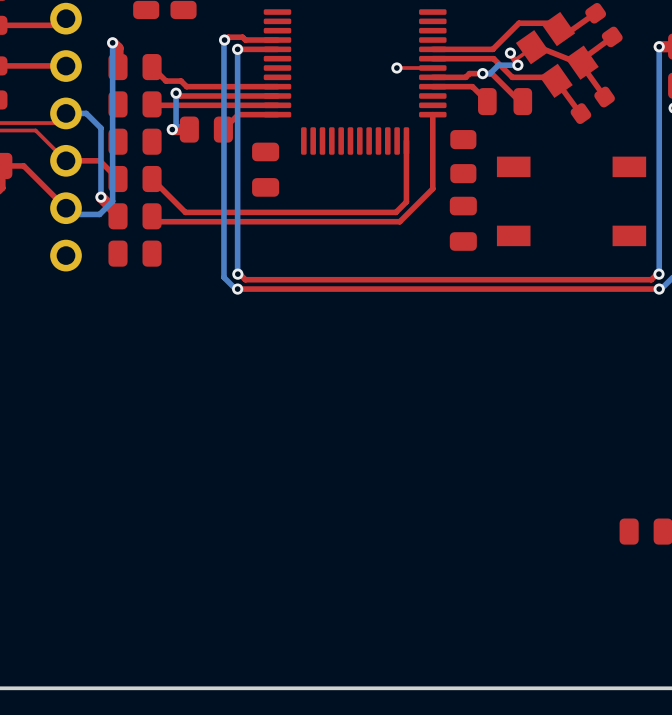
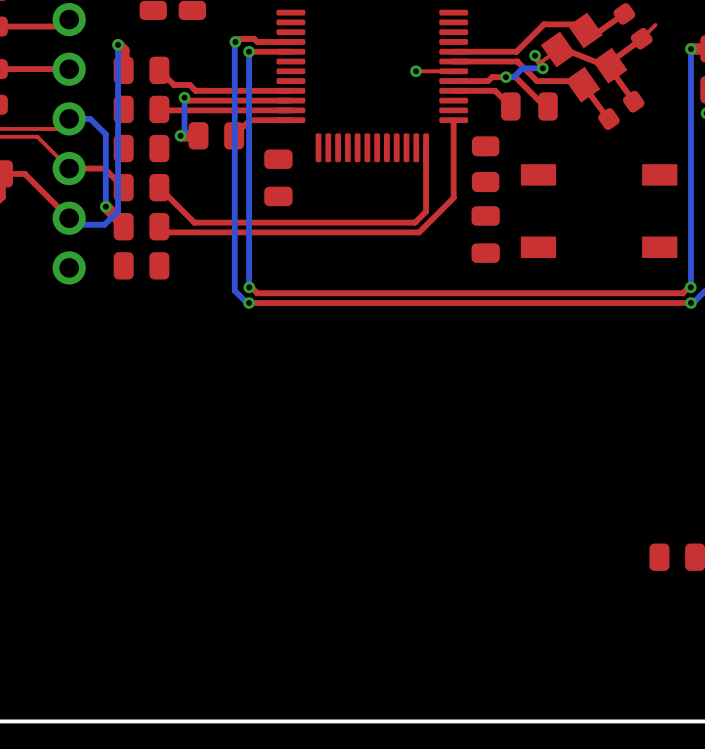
top track: none -> (655, 24) (641, 38)

